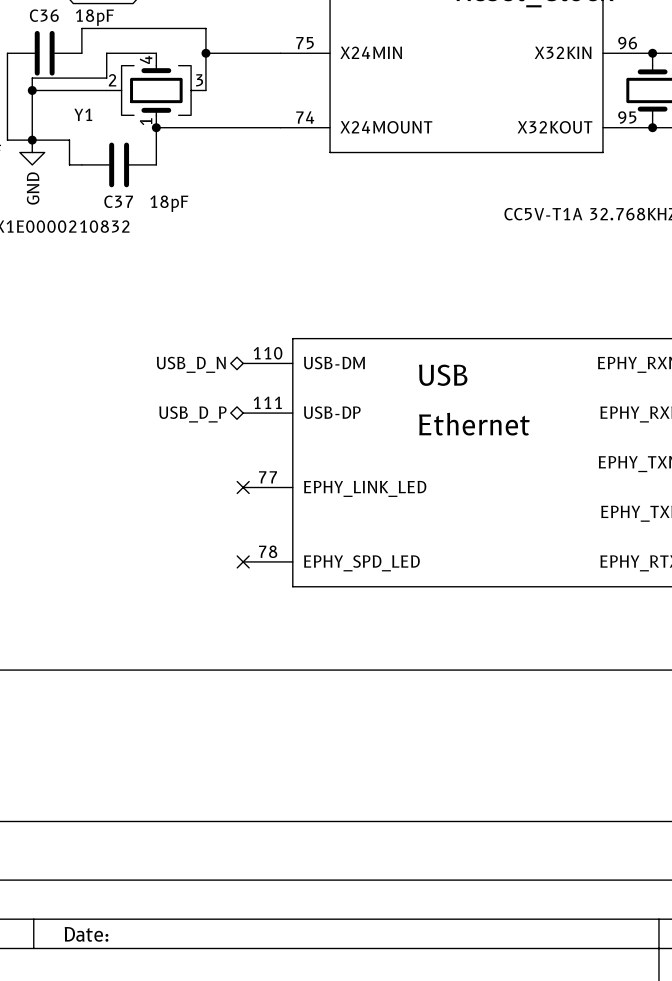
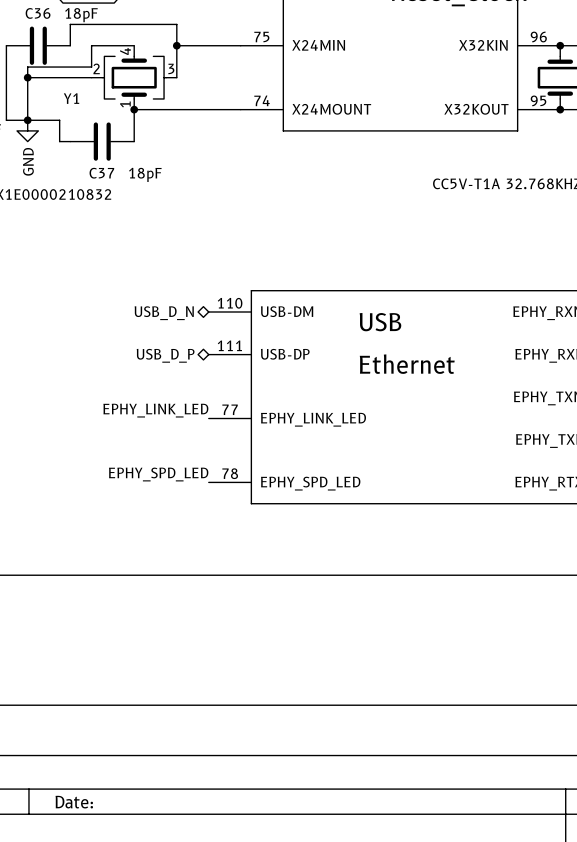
label: none -> EPHY_LINK_LED (155, 410)
no-connect mark: (243, 487) -> none
label: none -> EPHY_SPD_LED (158, 474)
no-connect mark: (243, 561) -> none

